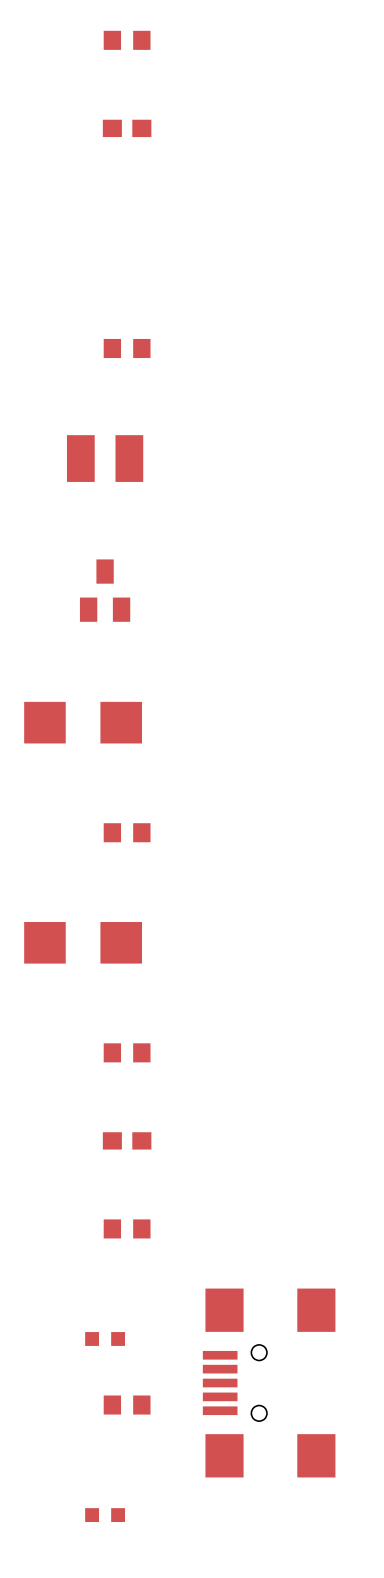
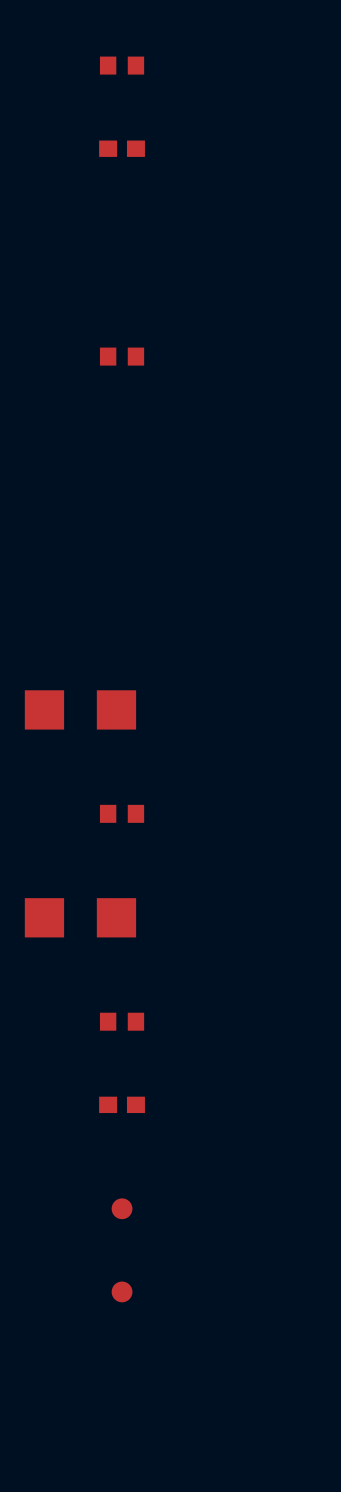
part: (105, 458) -> none
part: (105, 590) -> none
part: (127, 1228) -> none
part: none -> (122, 1208)
part: (105, 1338) -> none
part: none -> (122, 1291)
part: (269, 1383) -> none
part: (127, 1405) -> none
part: (105, 1515) -> none

